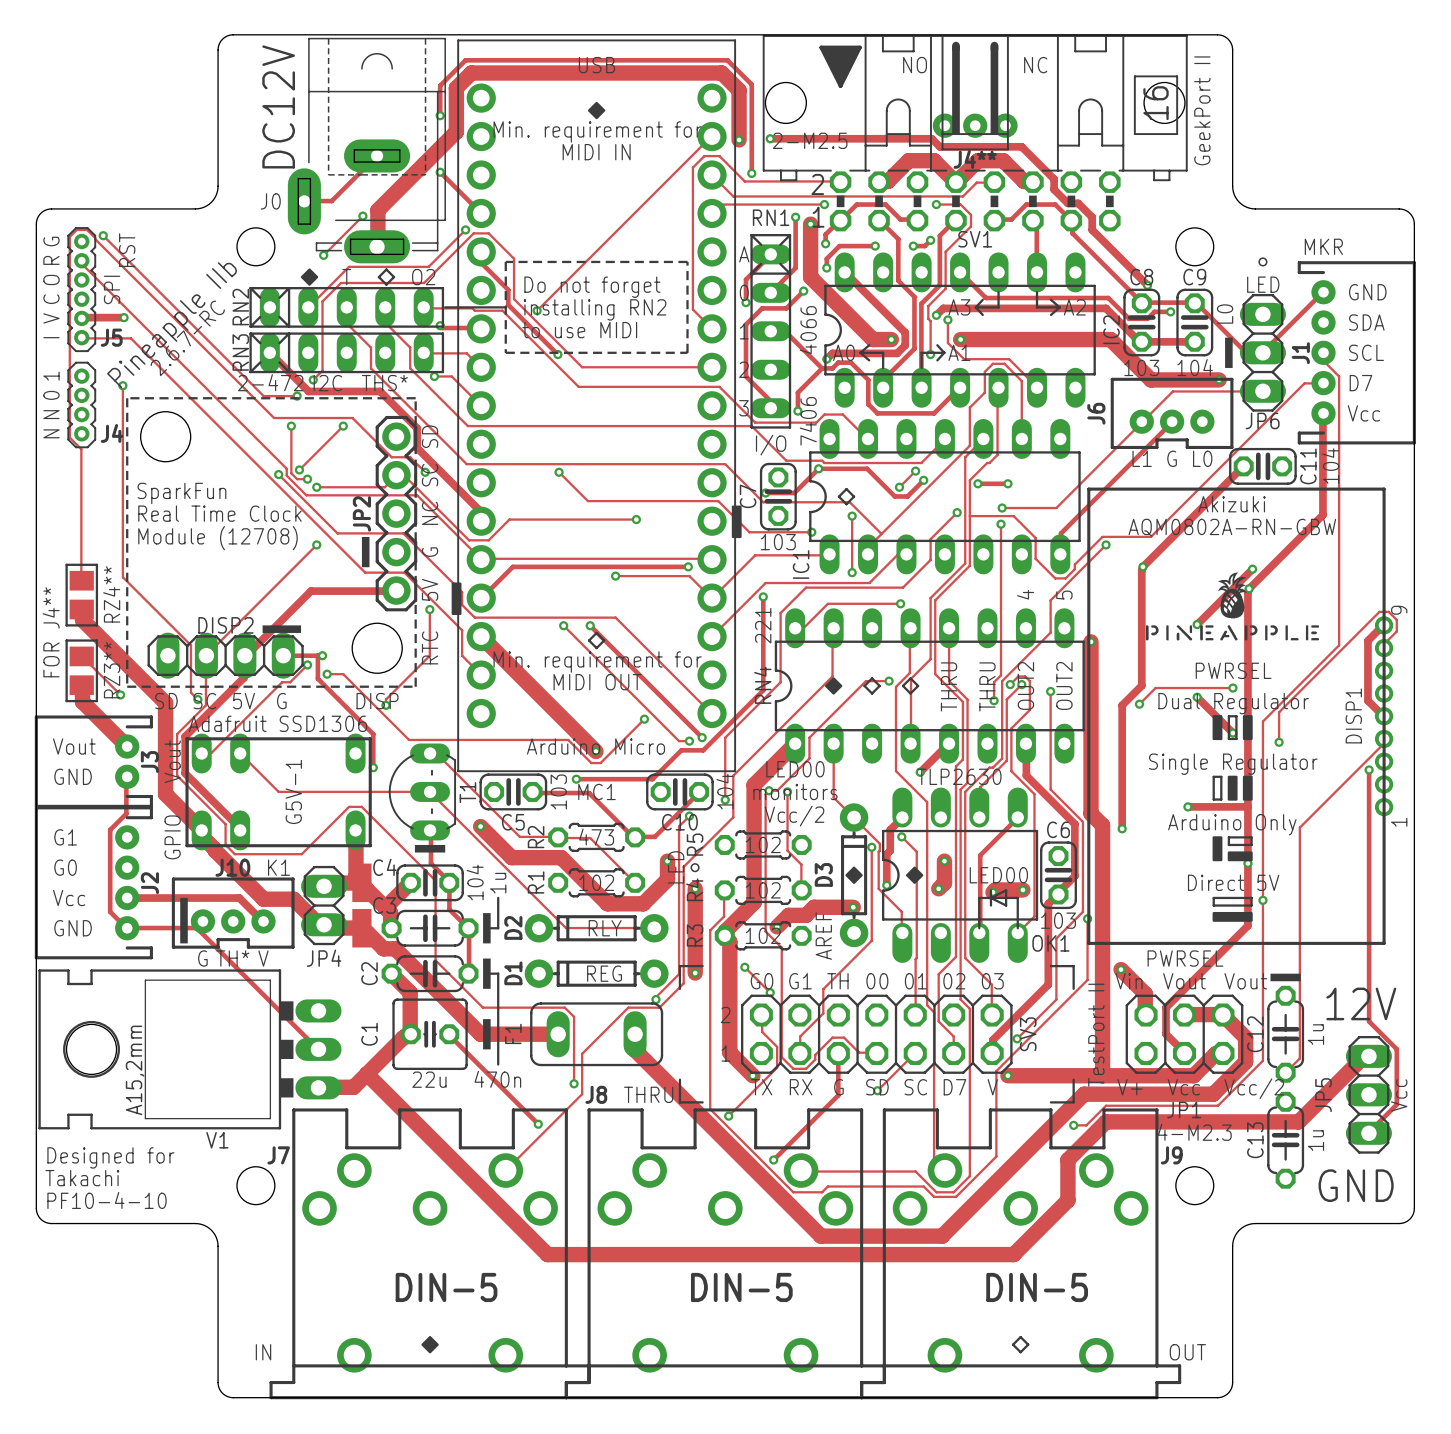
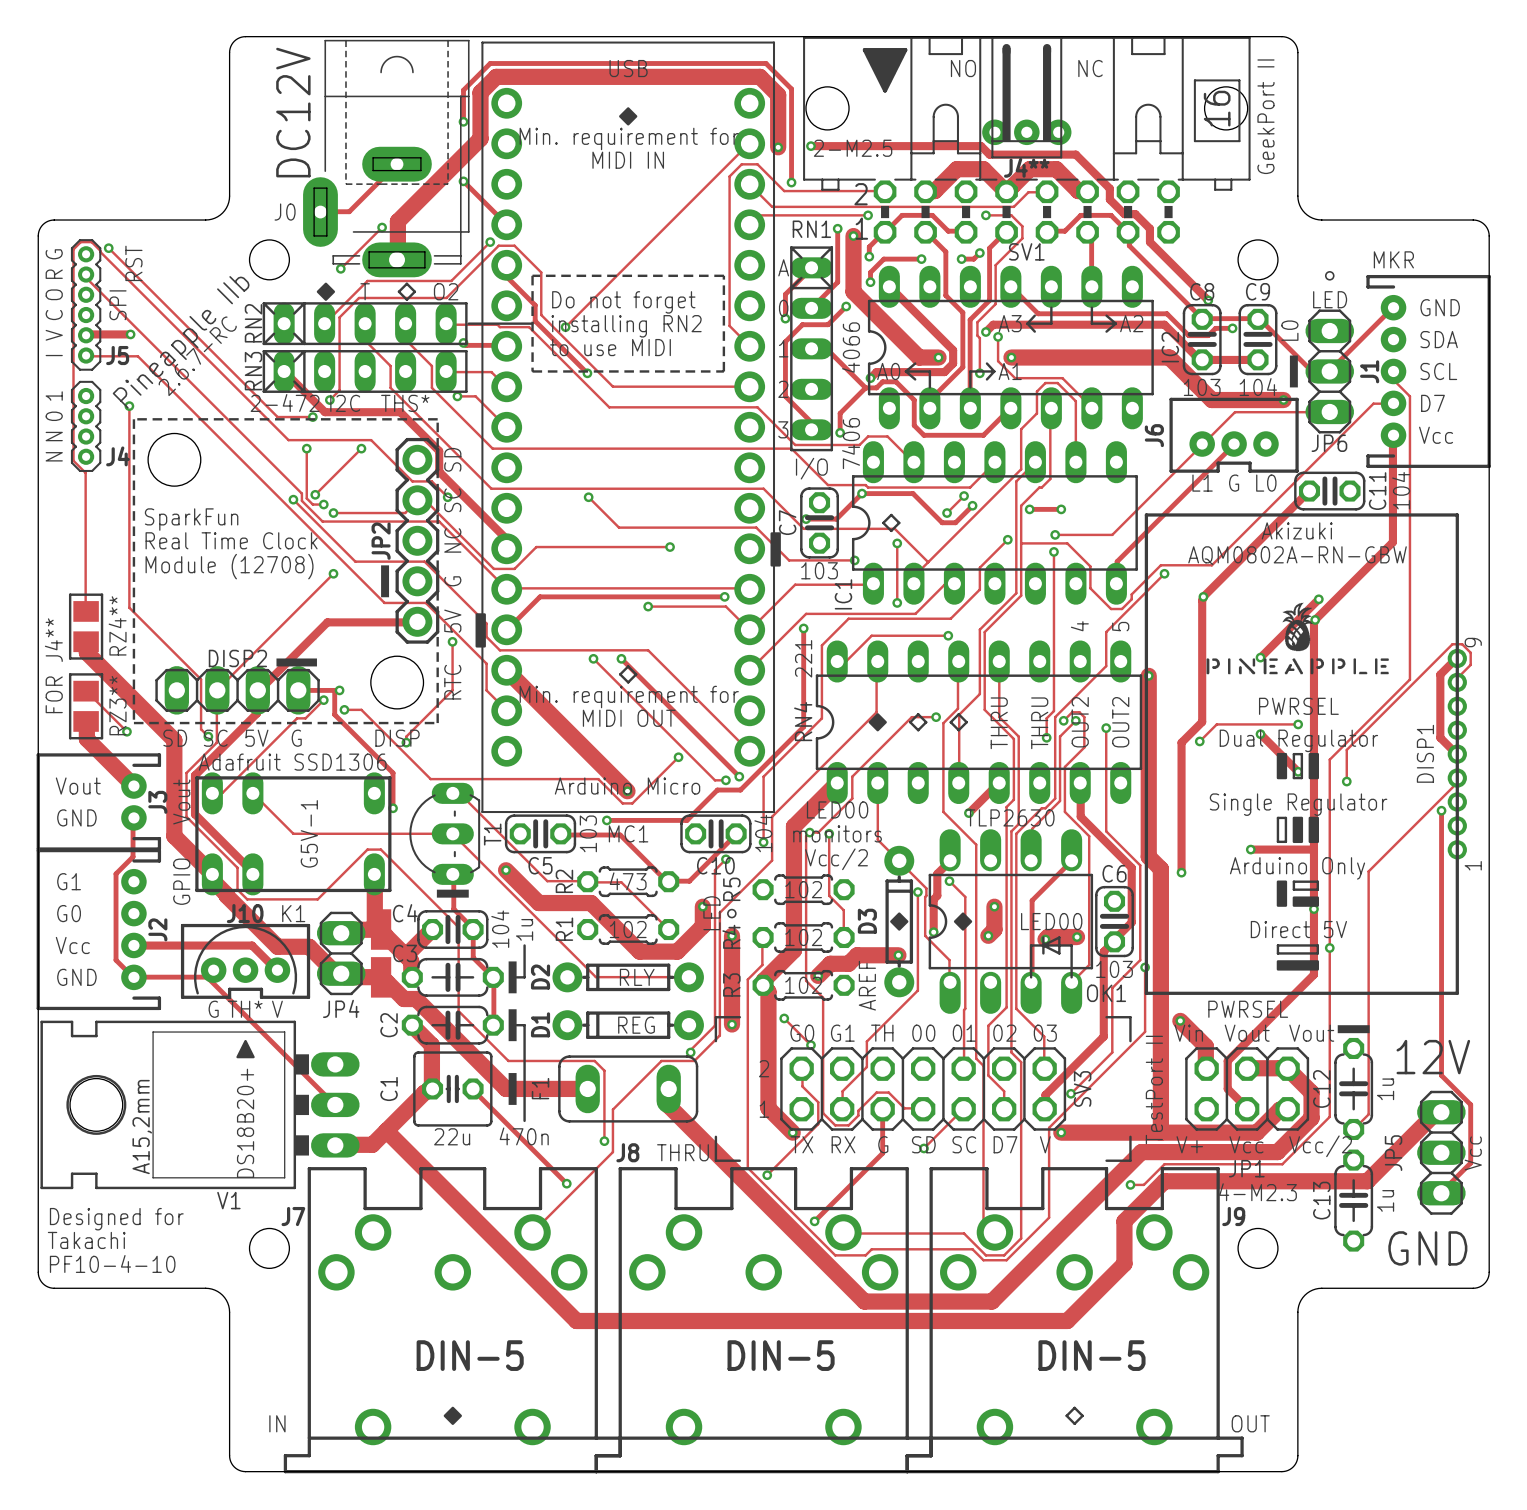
drawing: [180, 897, 188, 944] -> none
line: none -> (197, 993) (195, 980) (195, 968) (199, 956) (206, 945) (215, 936) (226, 930) (245, 926) (264, 930) (275, 936) (284, 945) (291, 956) (295, 968) (295, 980) (293, 993)
drawing: none -> [236, 1039, 255, 1059]
text: none -> DS18B20+ (245, 1123)

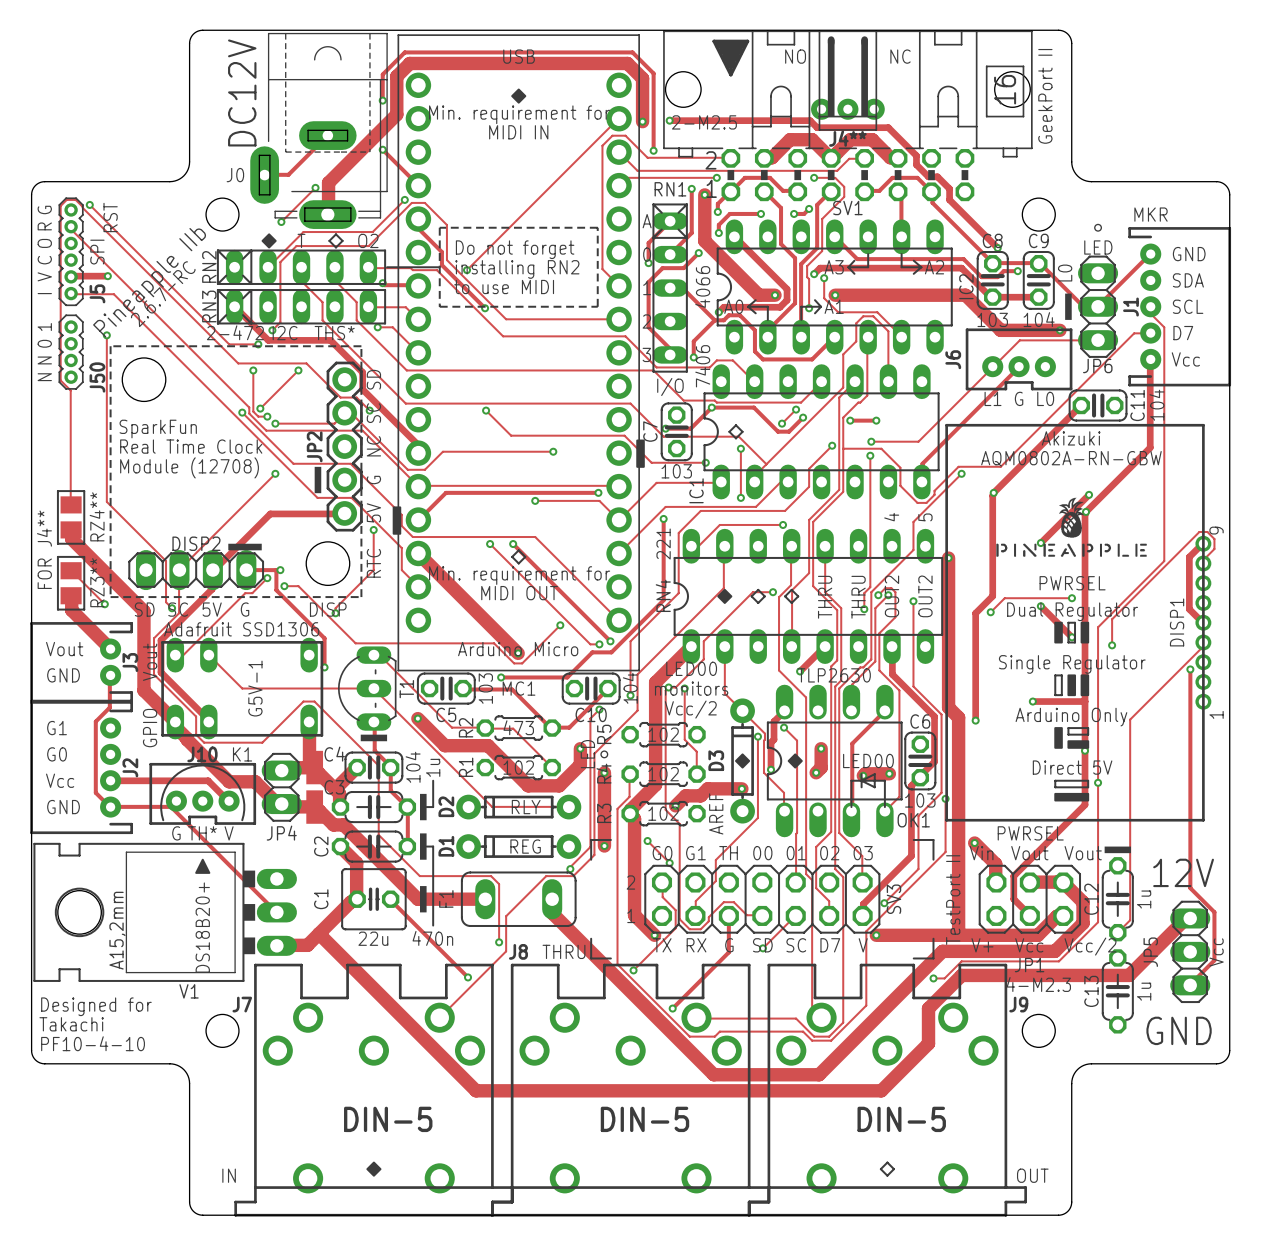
J5 name rotation: 0° (117, 355) -> 90° counterclockwise (97, 293)
J4 name: J4 (117, 456) -> J50 (97, 377)

